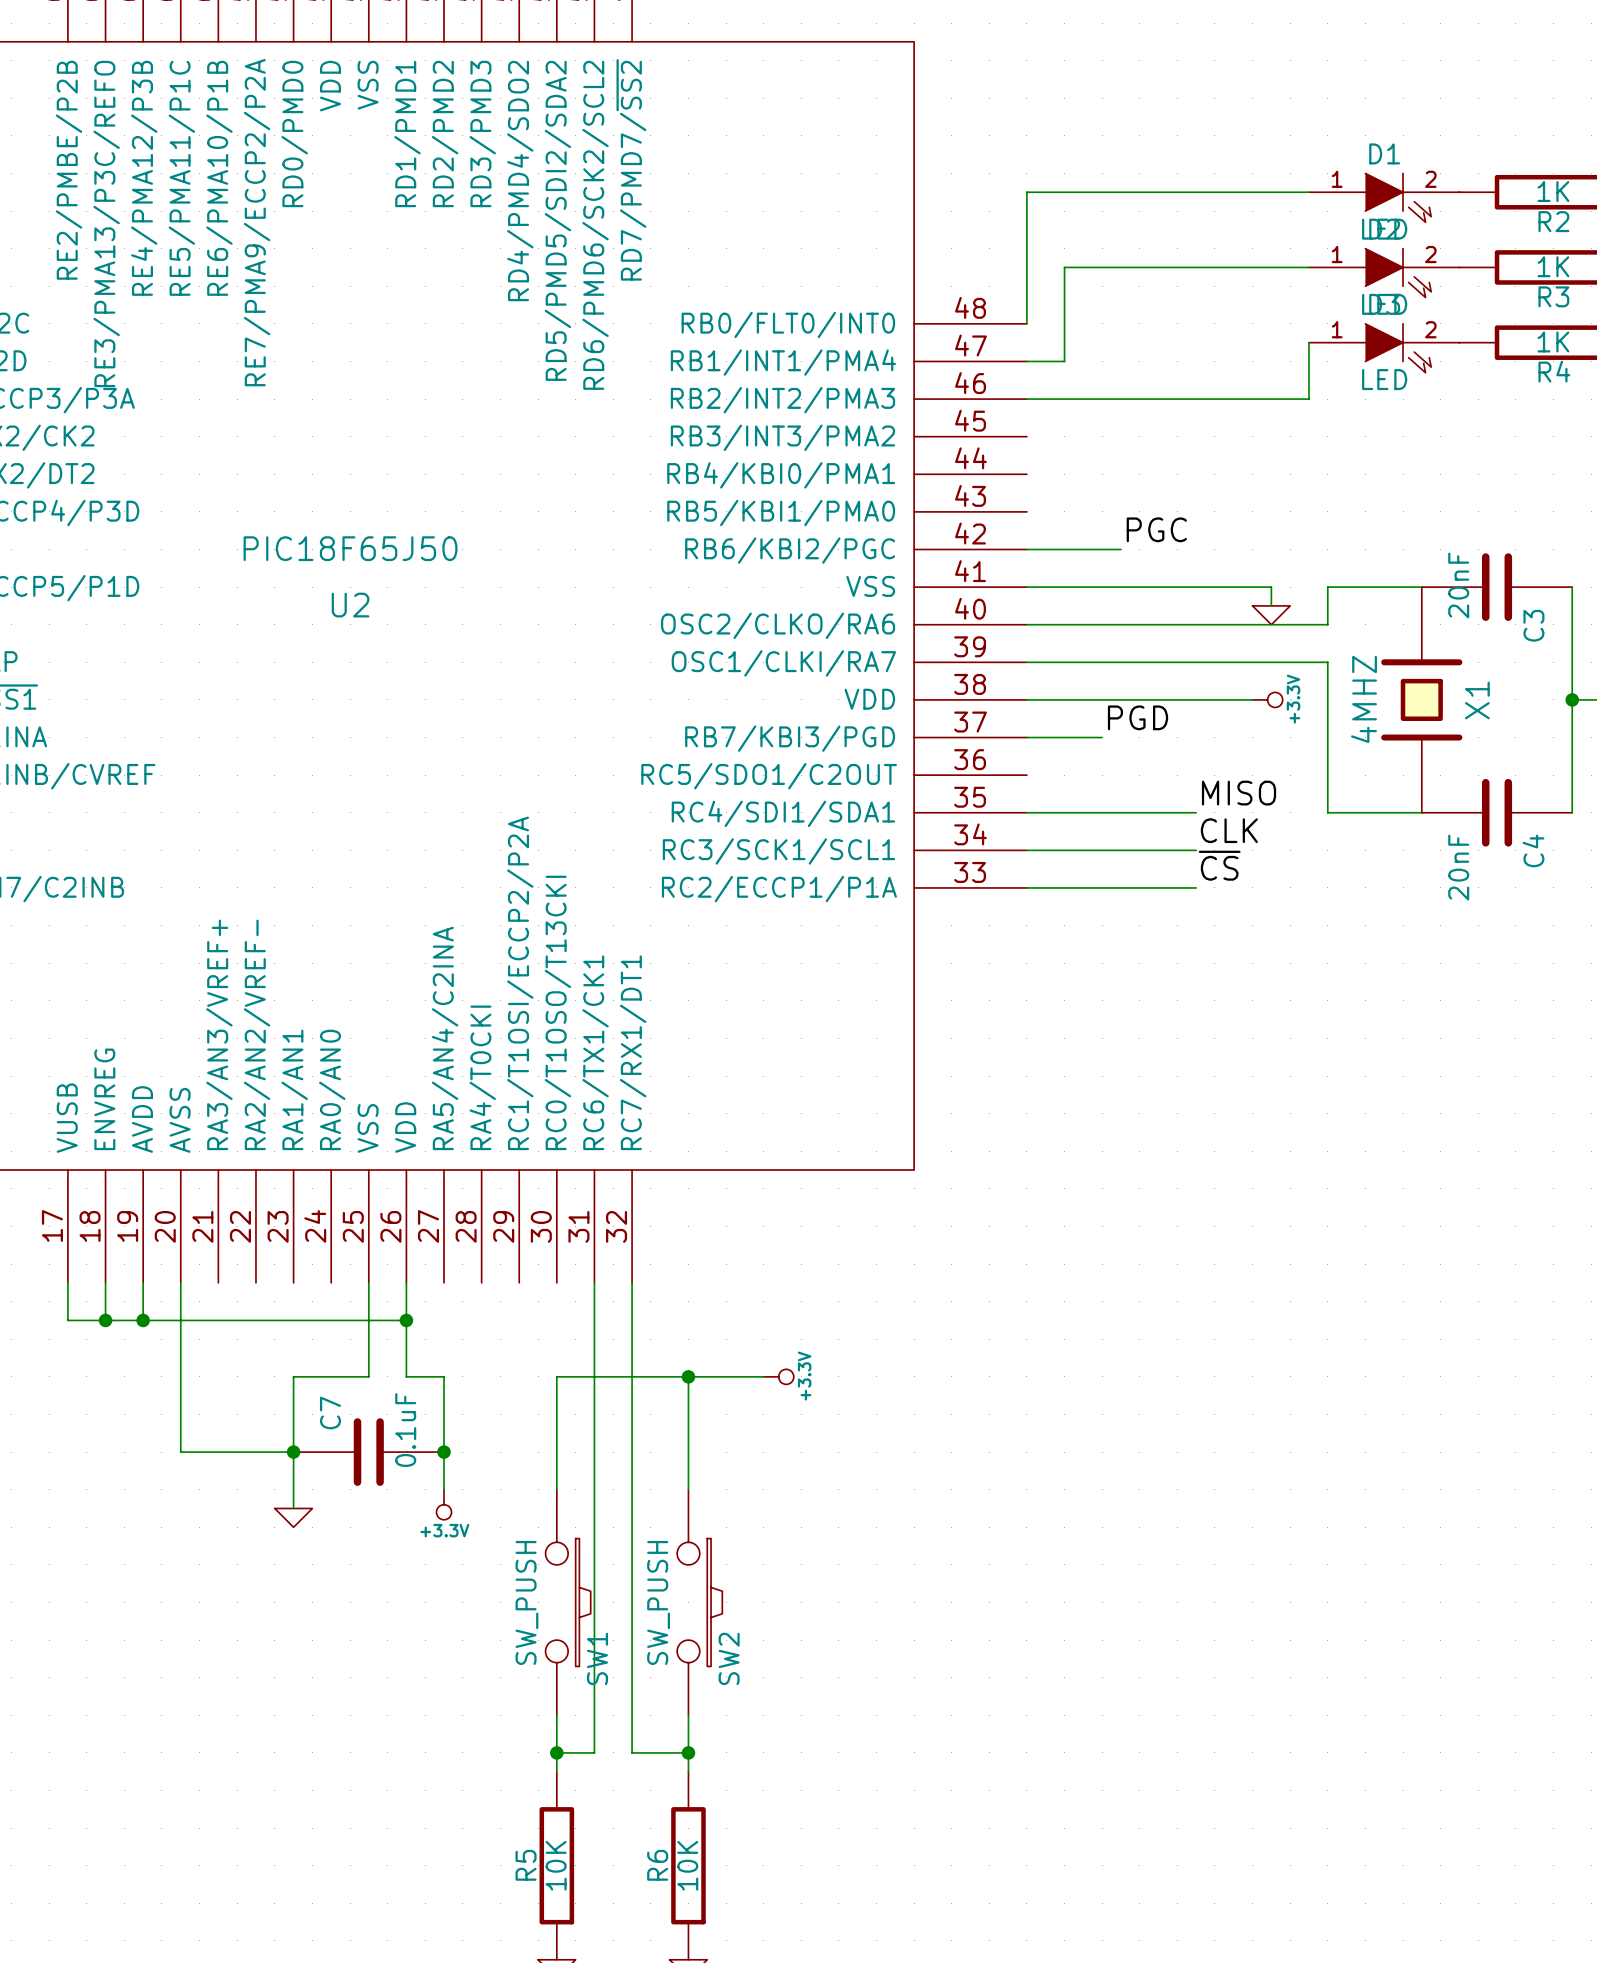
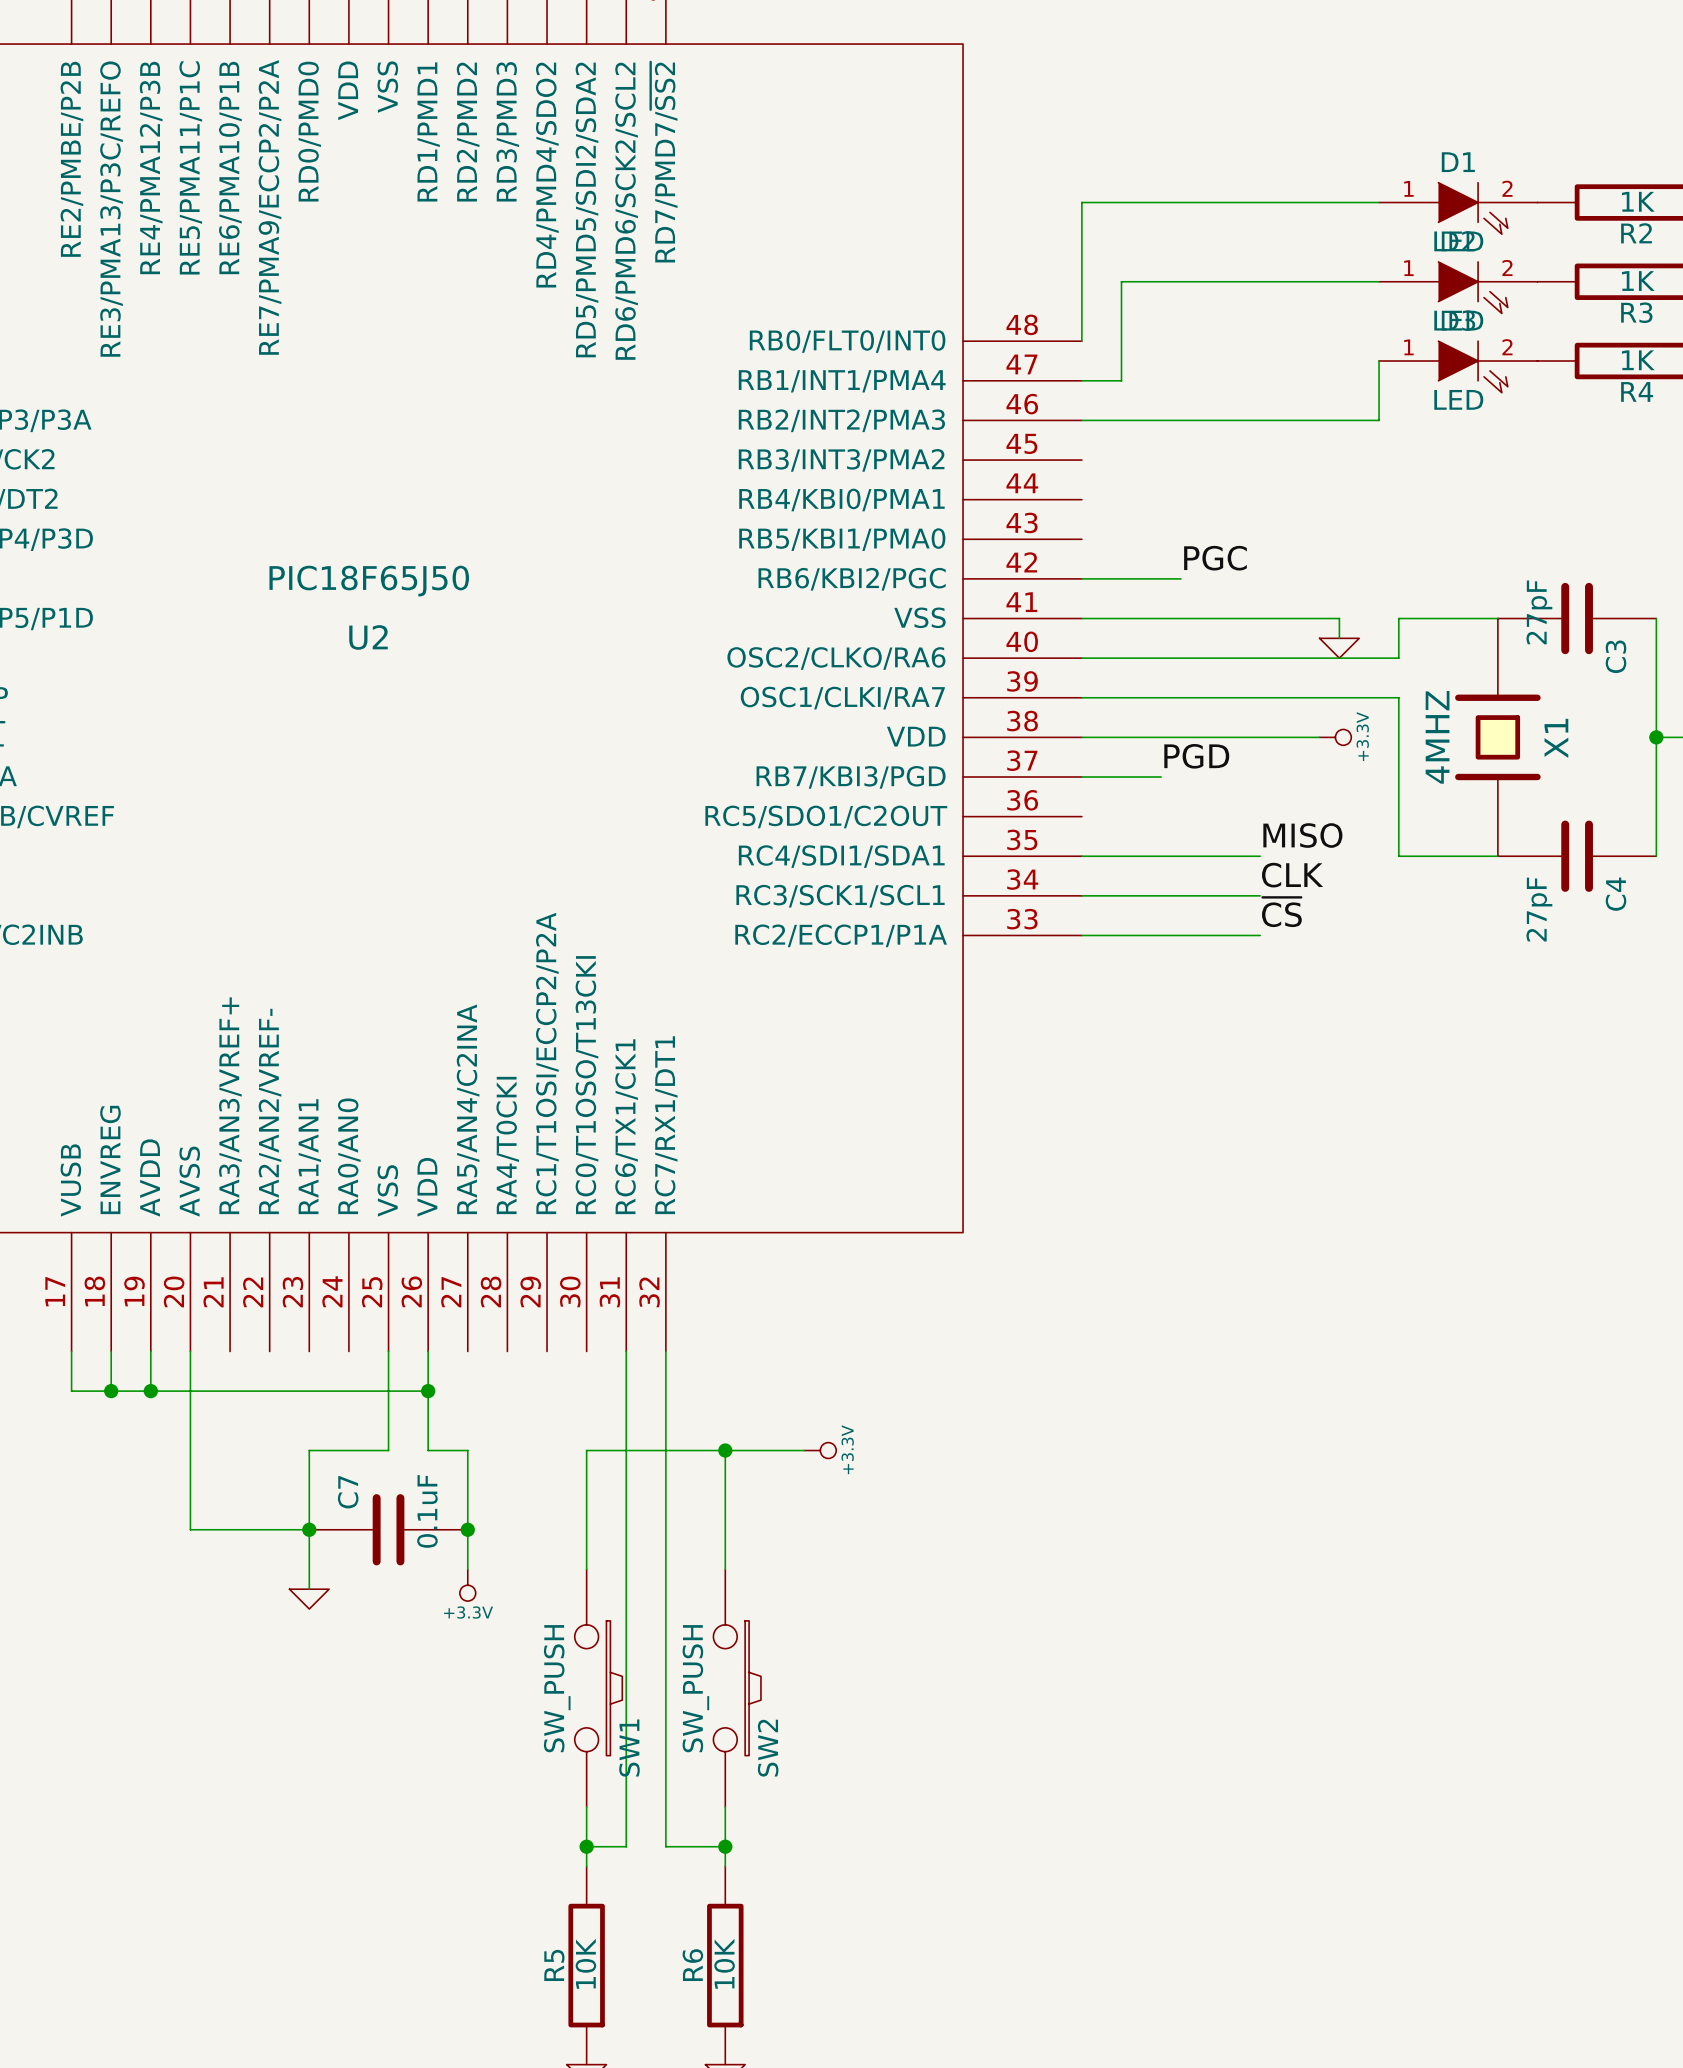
C3 value: 20nF (1458, 585) -> 27pF (1539, 612)
C4 value: 20nF (1458, 867) -> 27pF (1539, 909)

